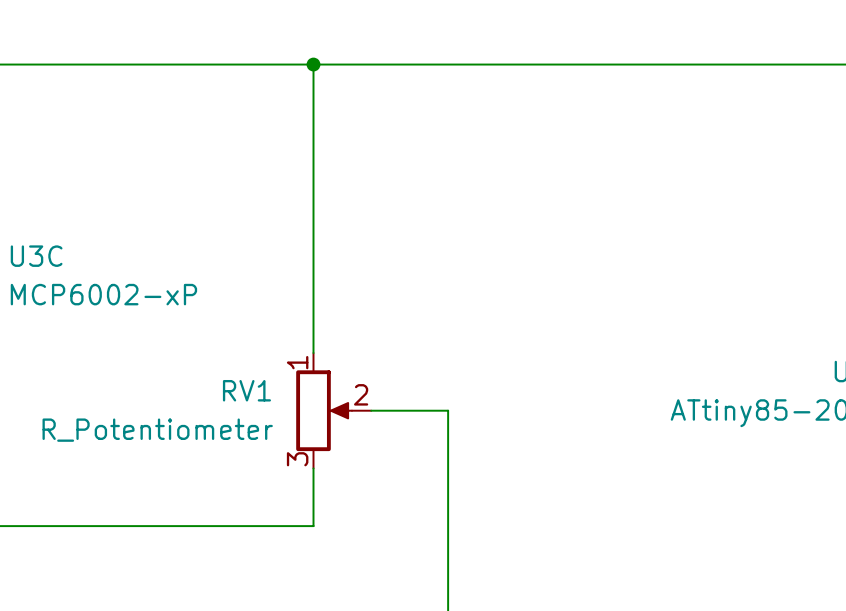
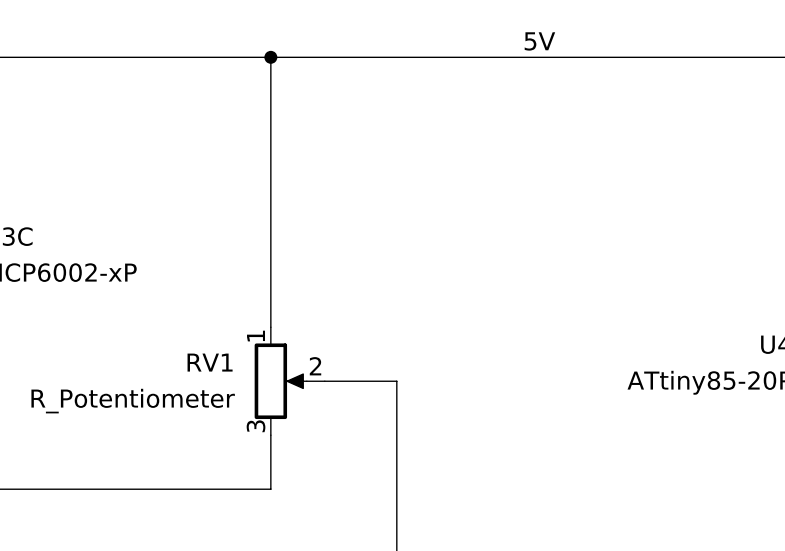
label: none -> 5V (539, 41)

